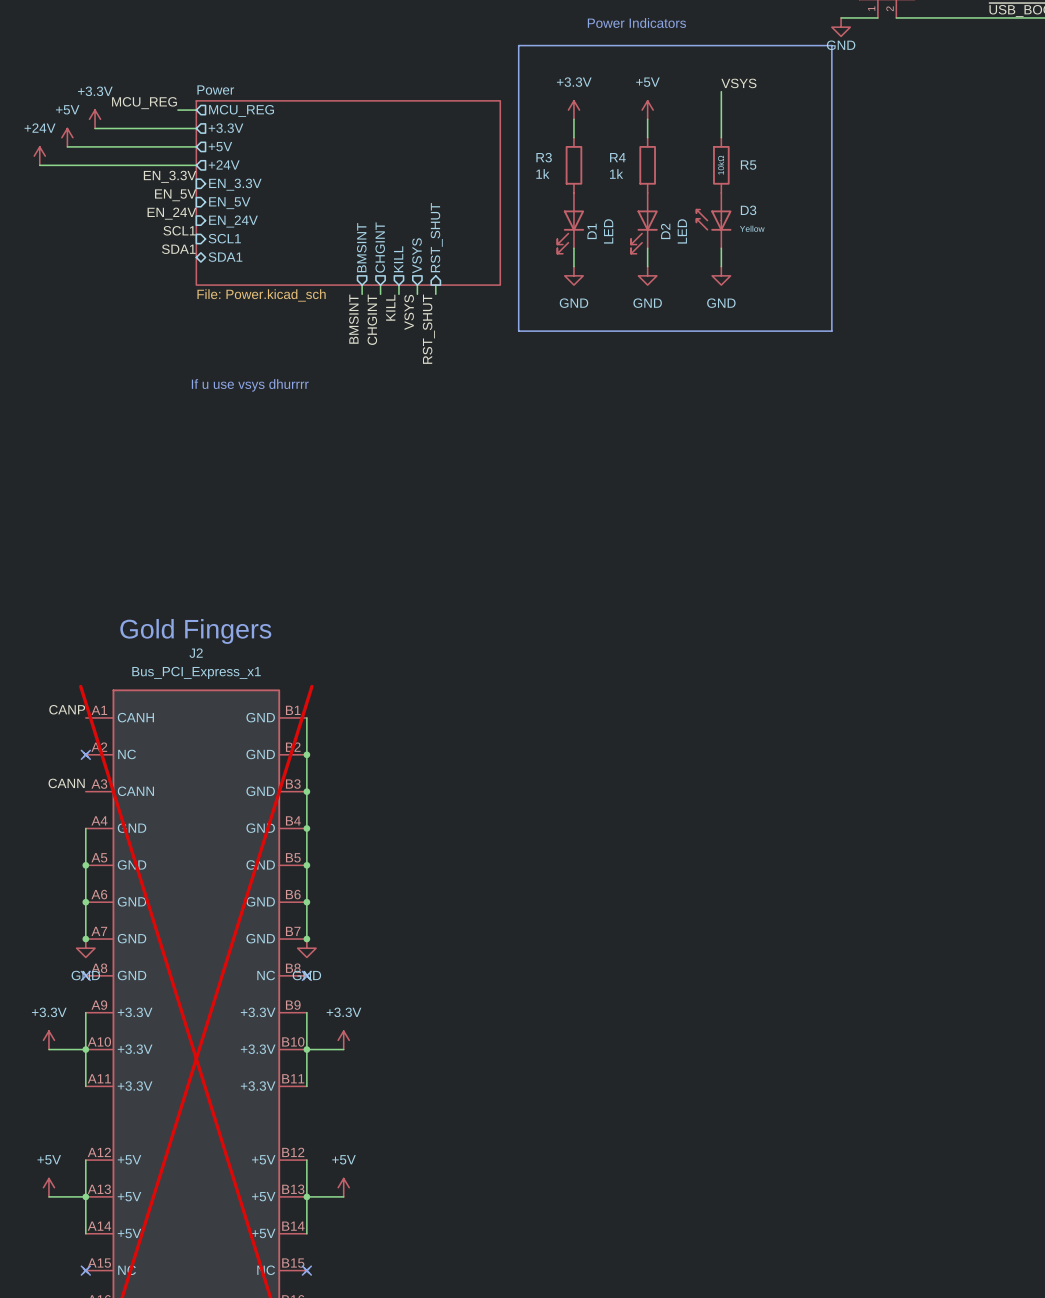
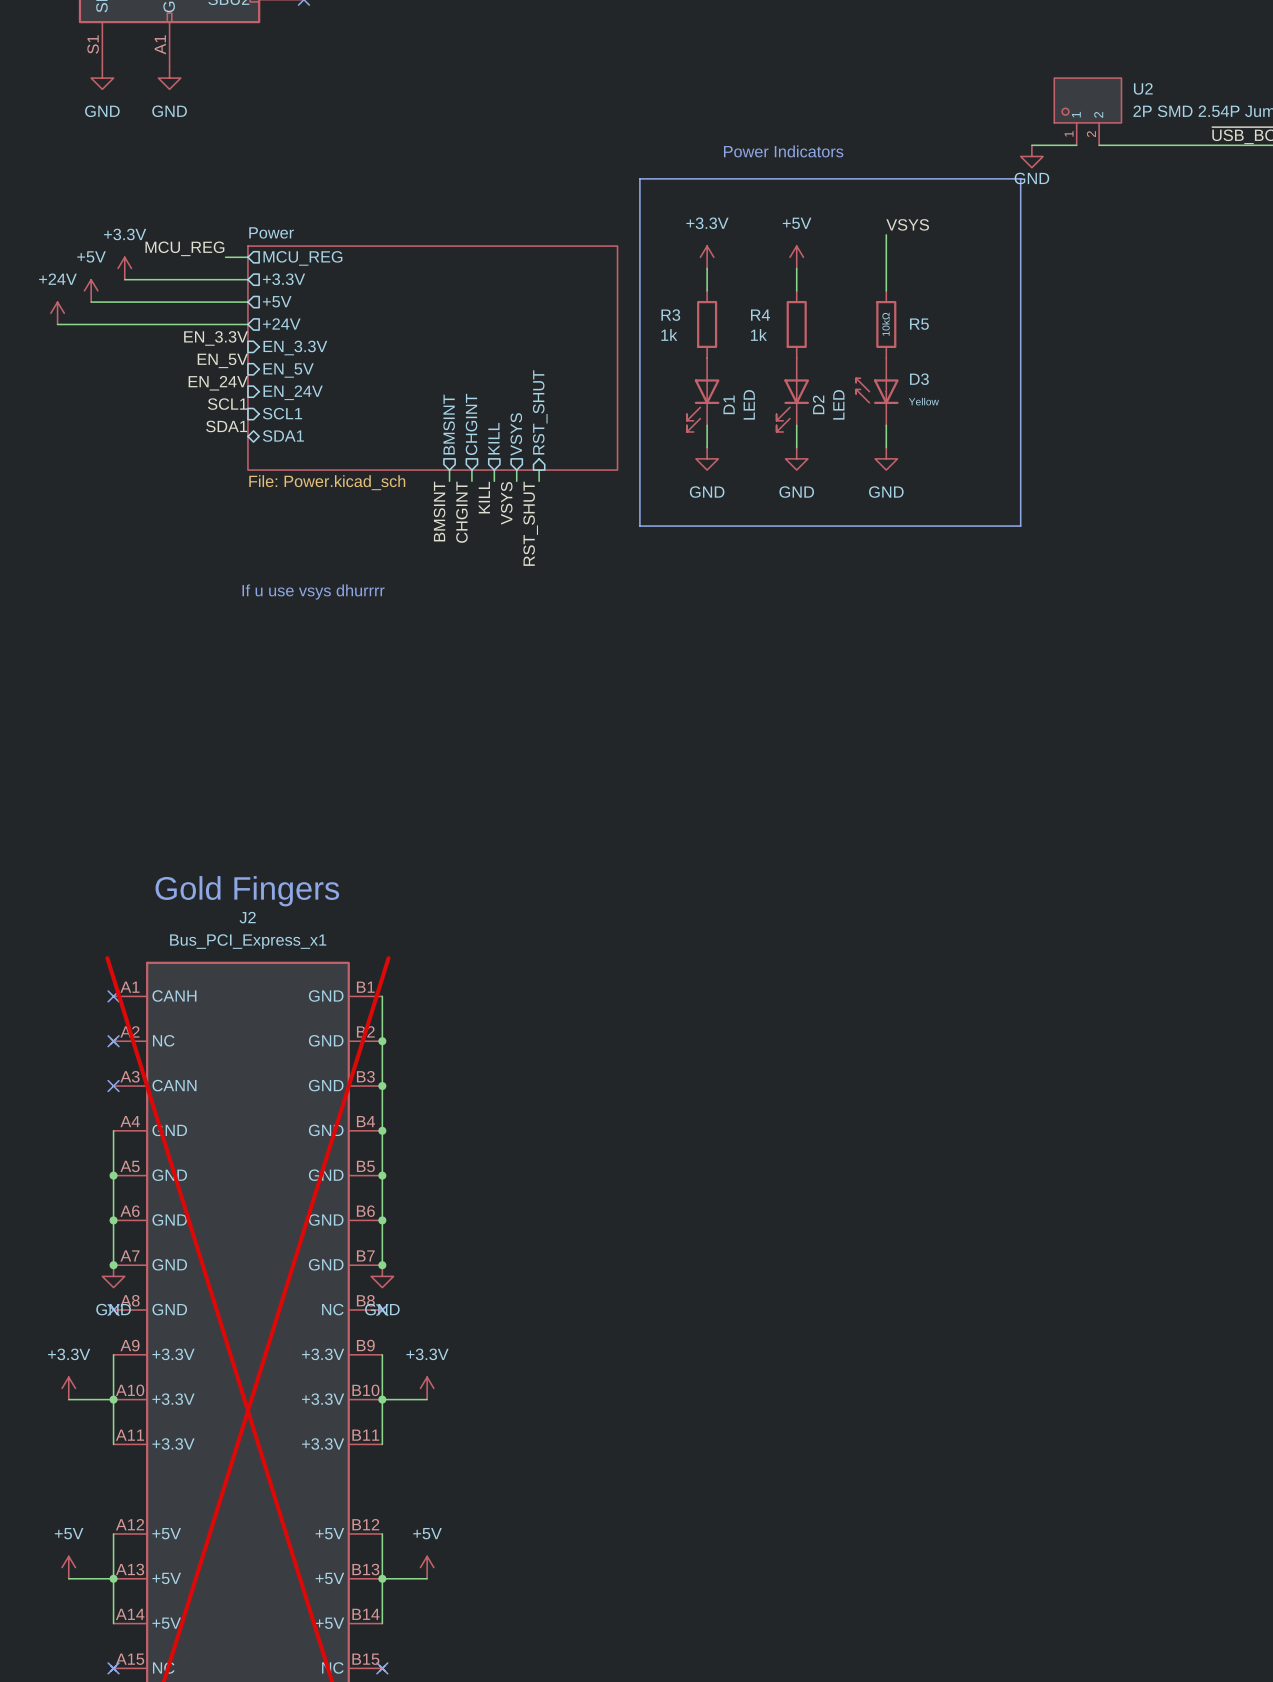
label: CANP (67, 709) -> none
no-connect mark: none -> (113, 996)
label: CANN (66, 783) -> none
no-connect mark: none -> (113, 1086)

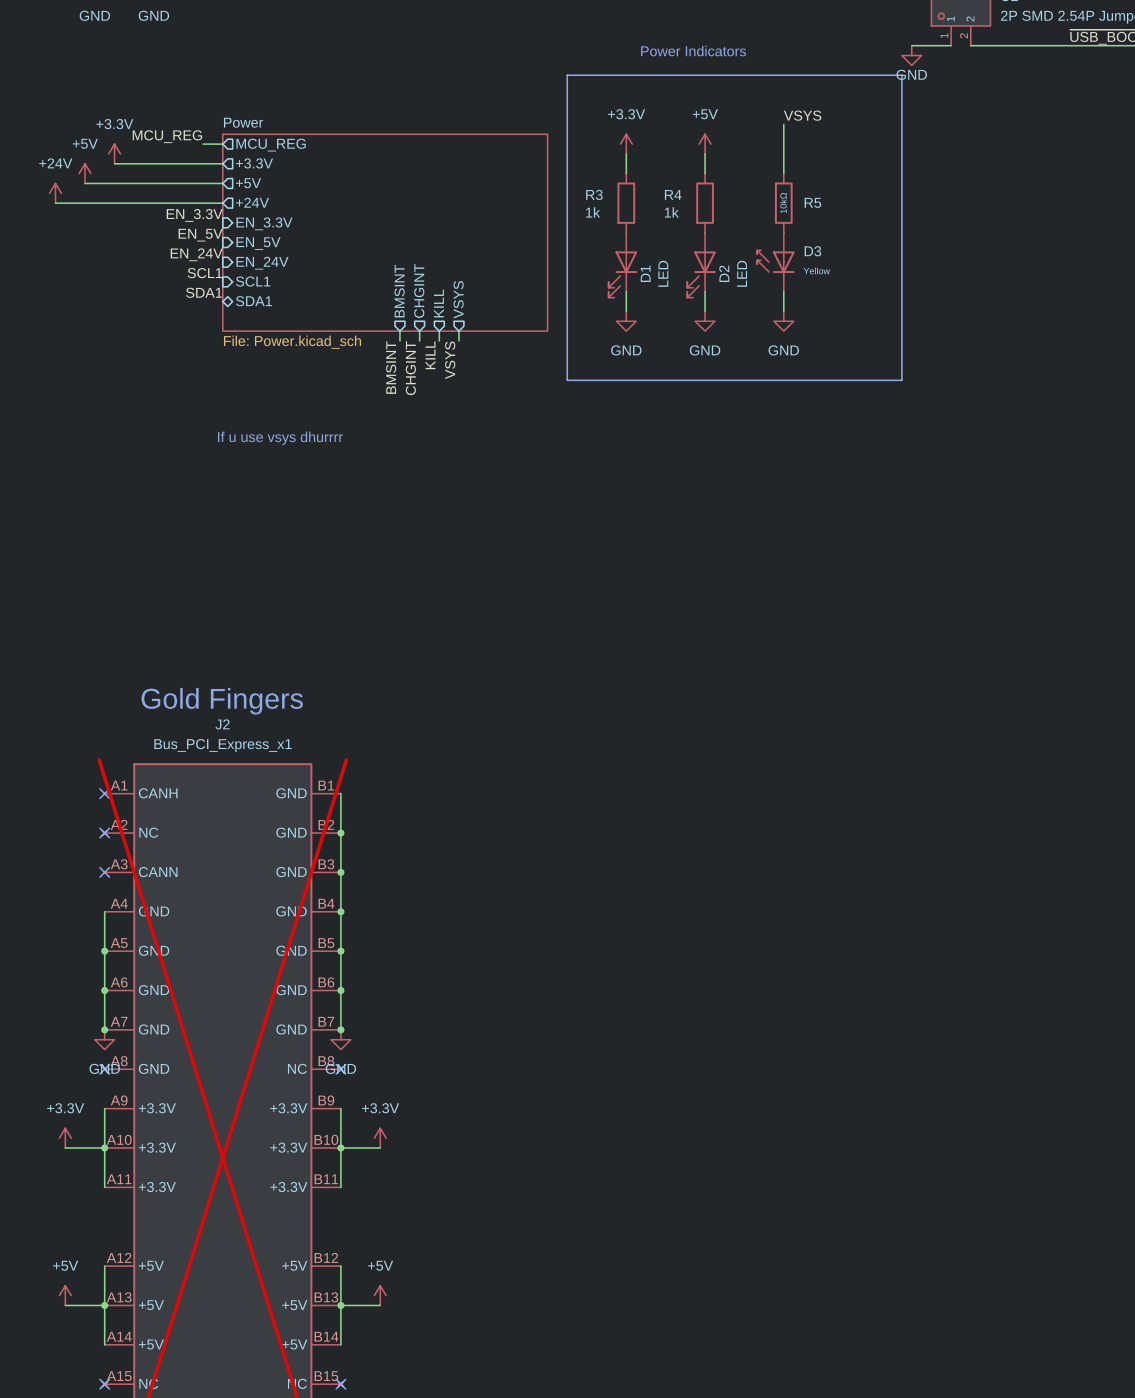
sheet pin: RST_SHUT (540, 412) -> none
wire: (539, 470) (539, 481) -> none
label: RST_SHUT (530, 523) -> none

